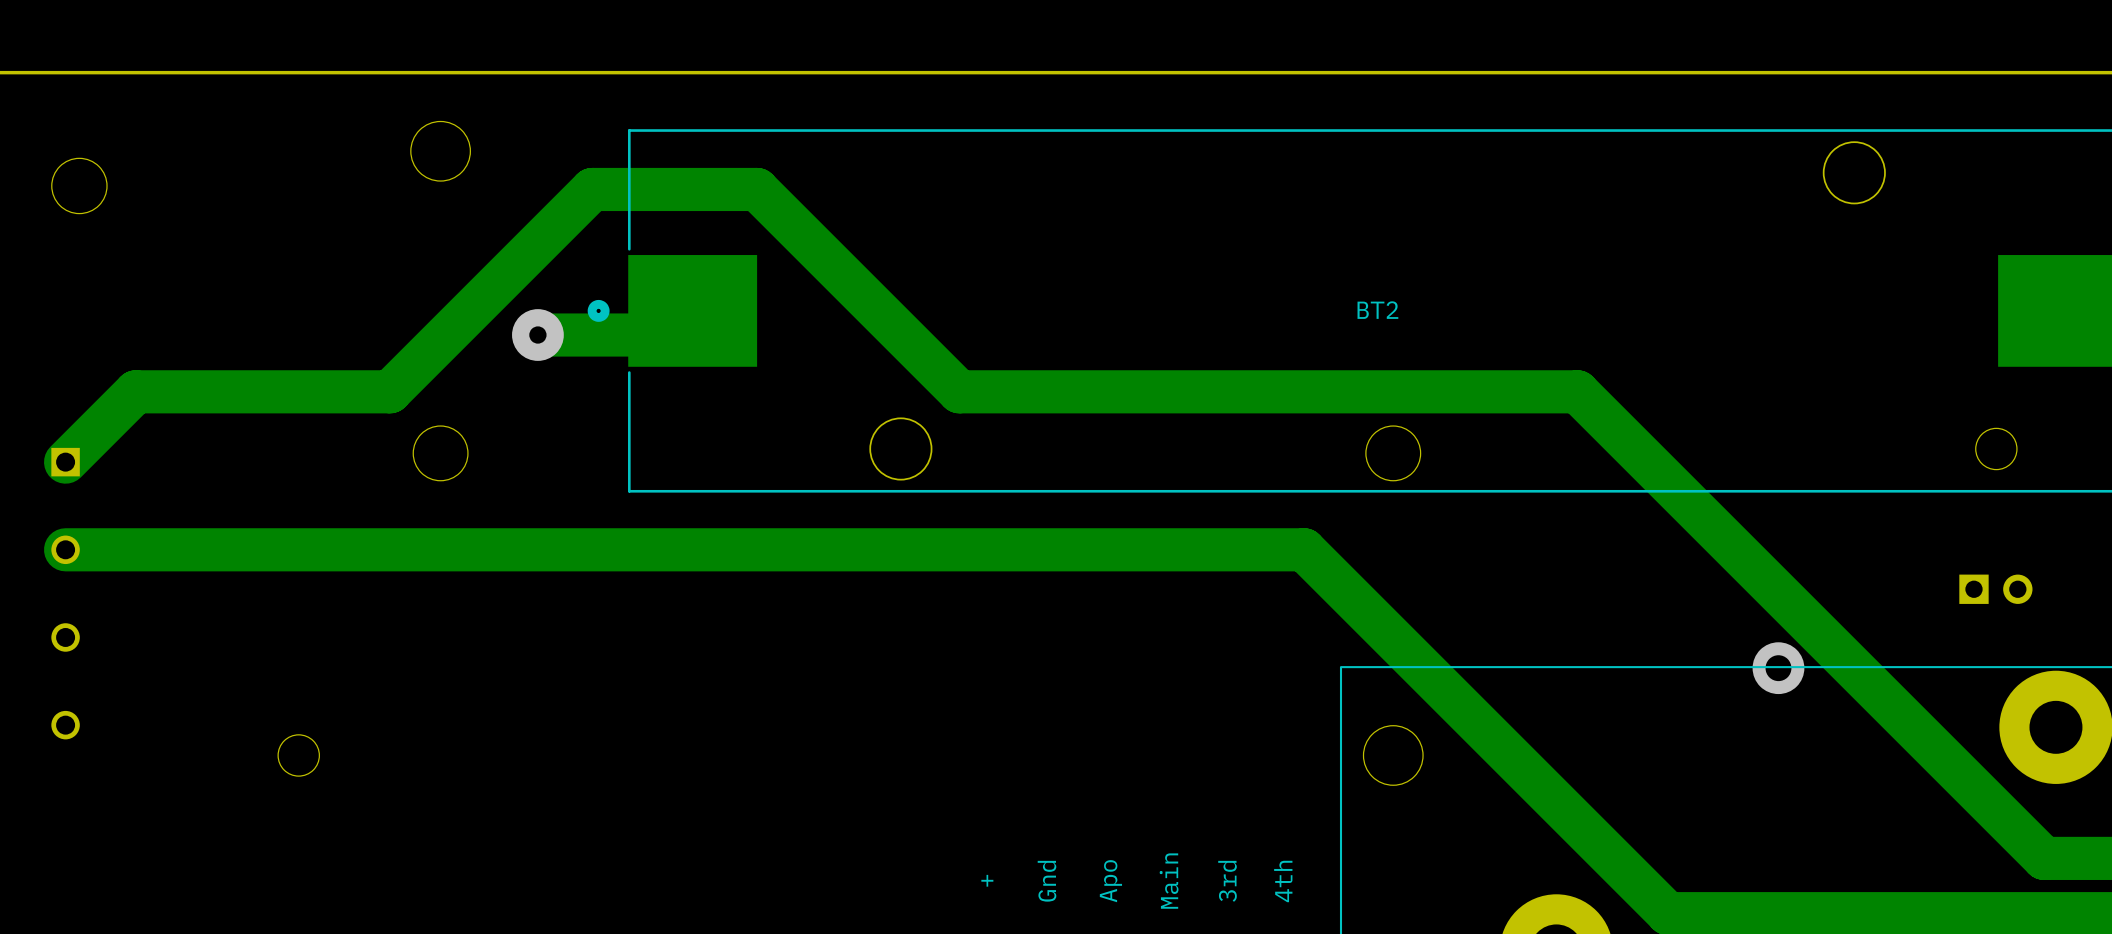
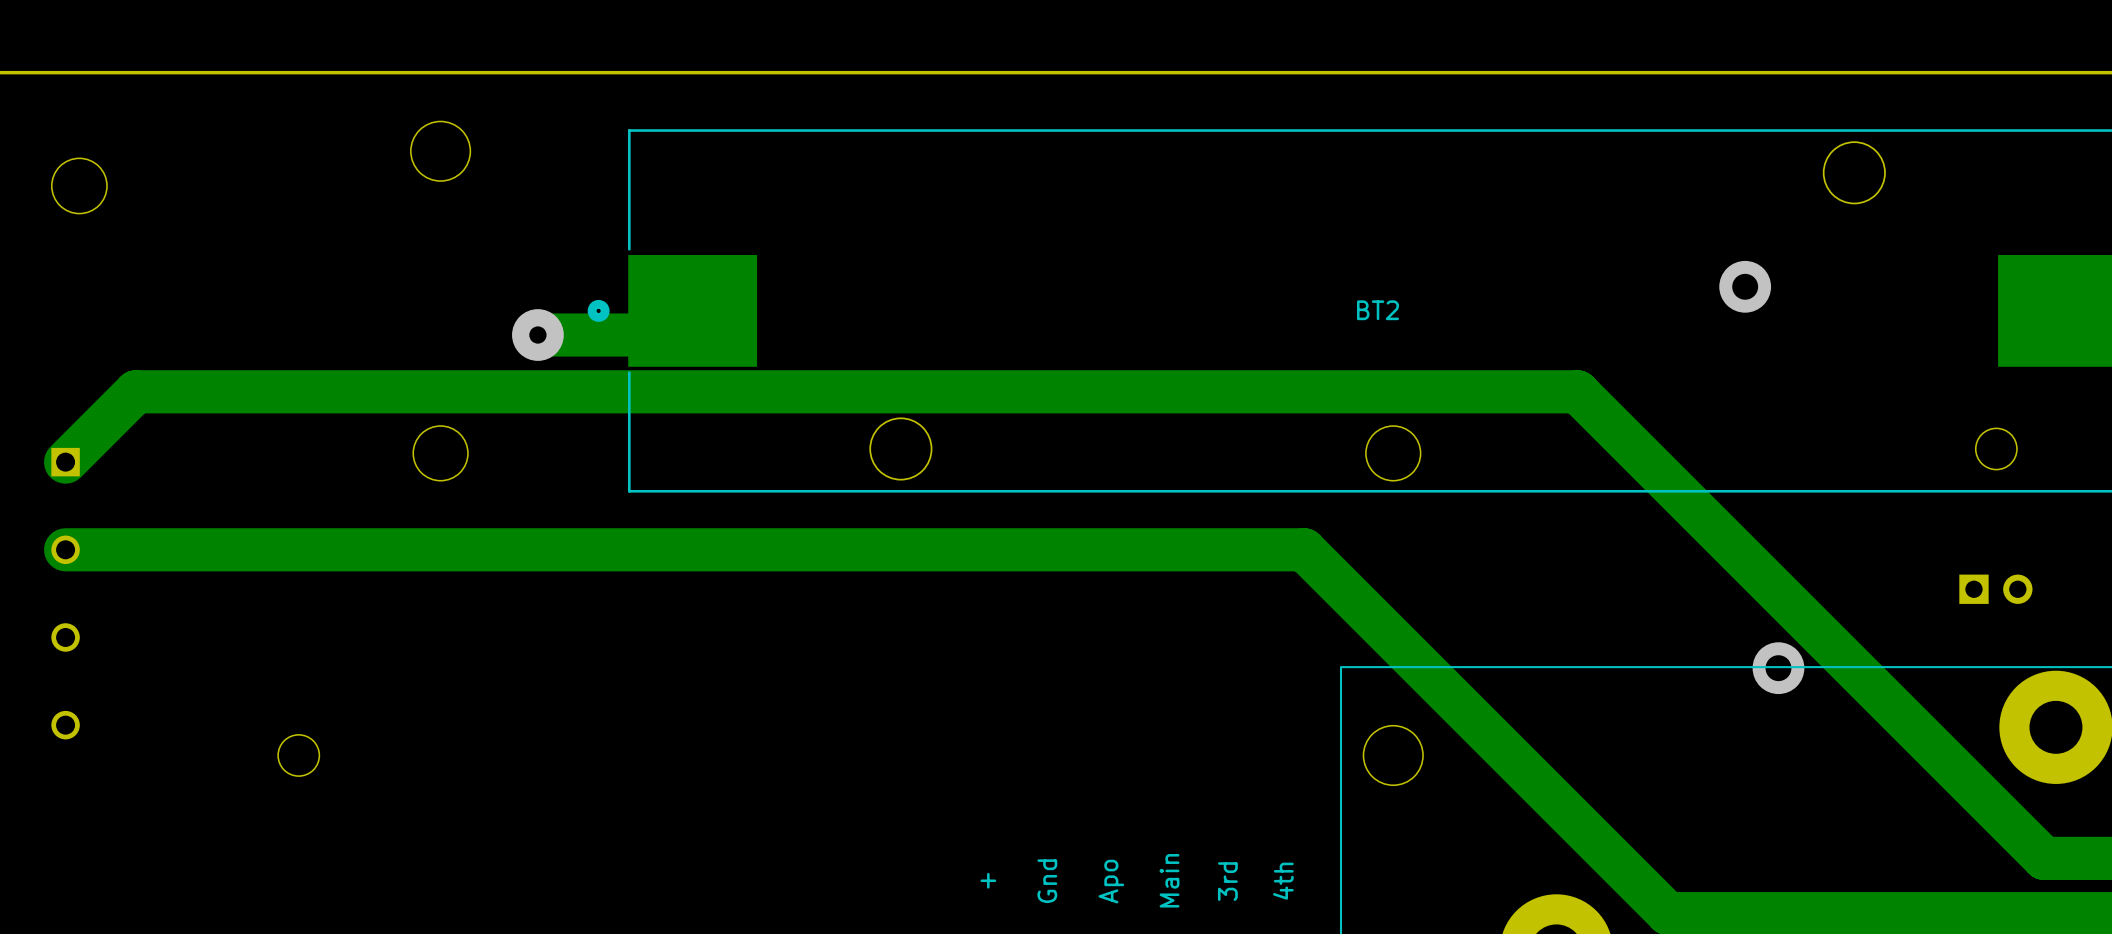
via: none -> (1745, 286)
track: (959, 391) (757, 189) (592, 189) (389, 391) -> (959, 391) (389, 391)

